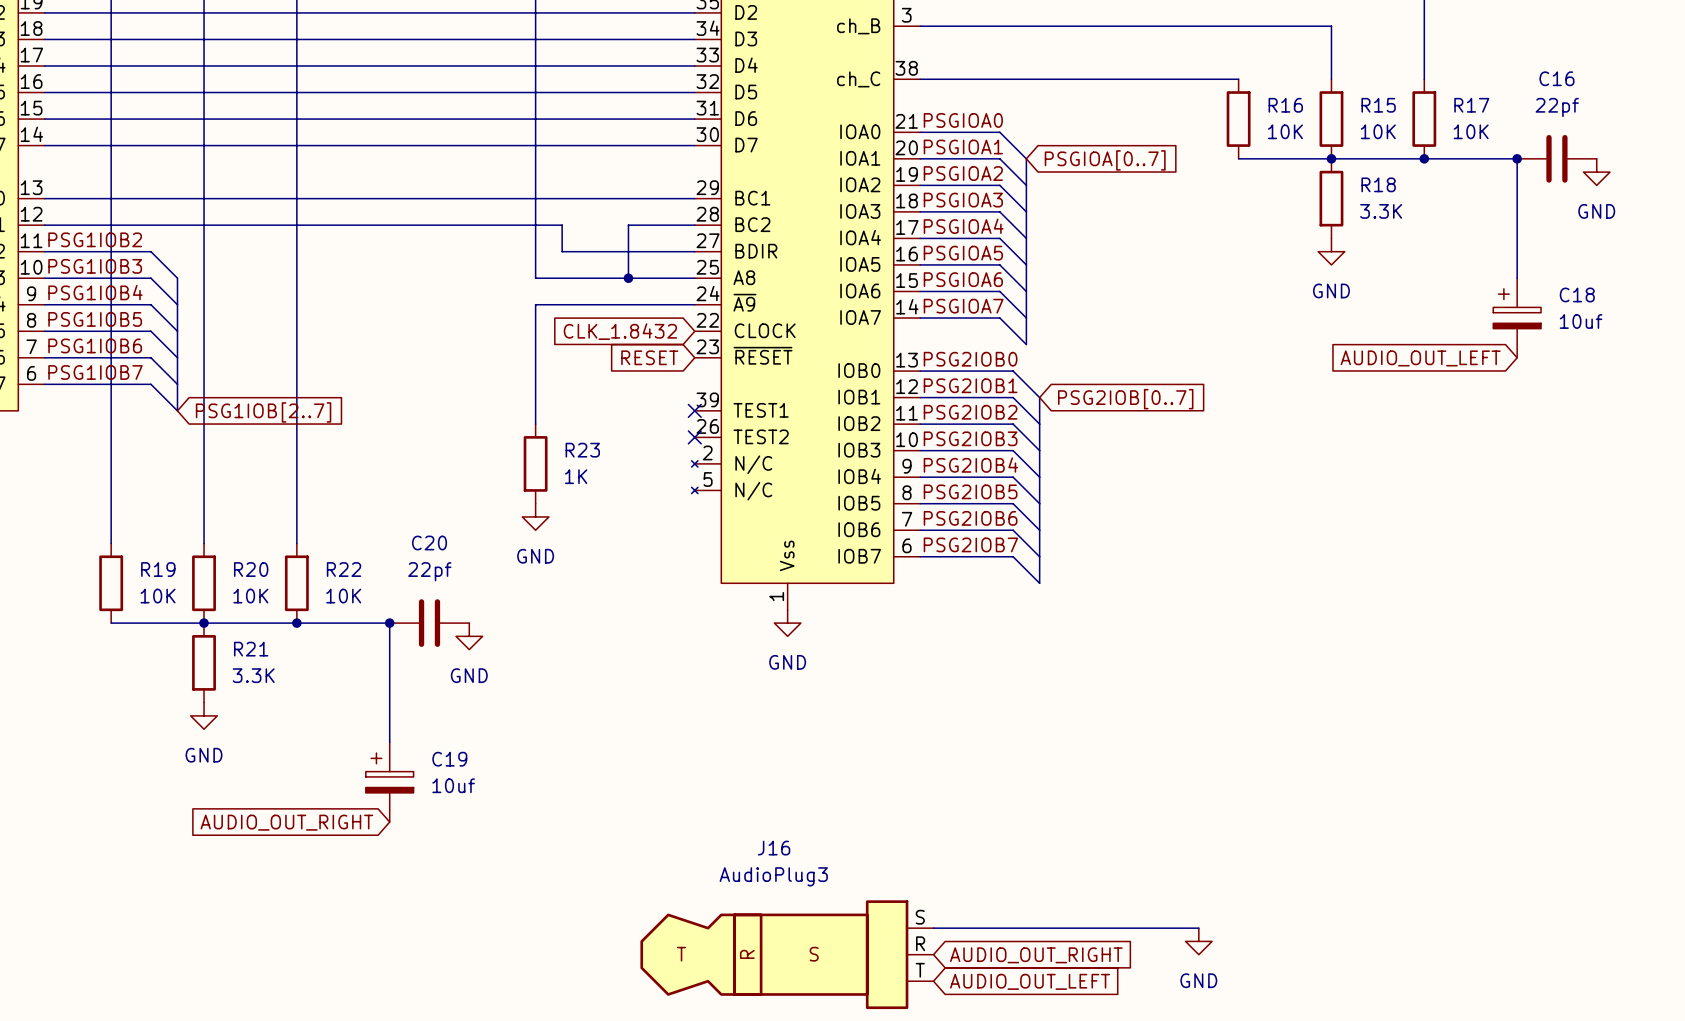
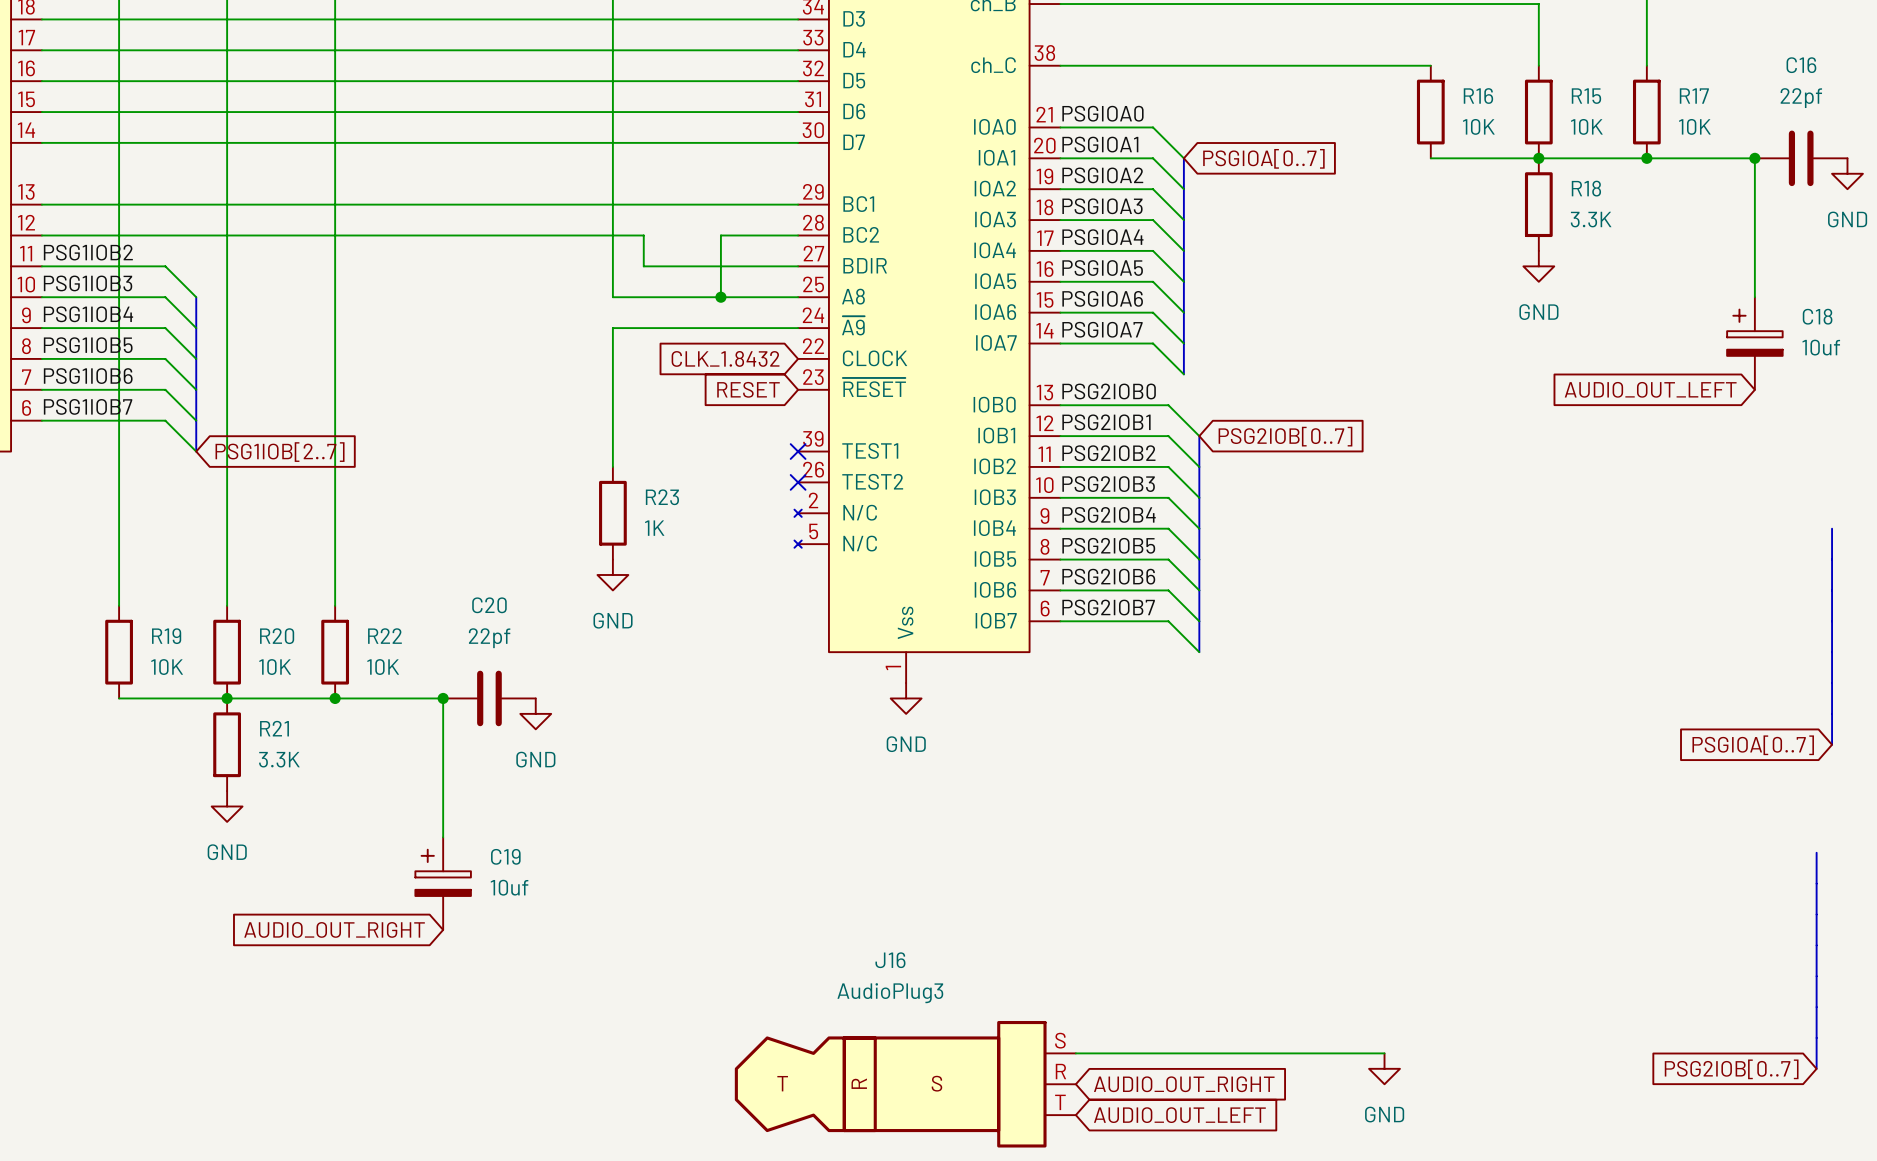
bus: none -> (1832, 528) (1832, 744)
global label: none -> PSGIOA[0..7] (1753, 745)
bus: none -> (1816, 852) (1816, 1068)
global label: none -> PSG2IOB[0..7] (1731, 1069)

